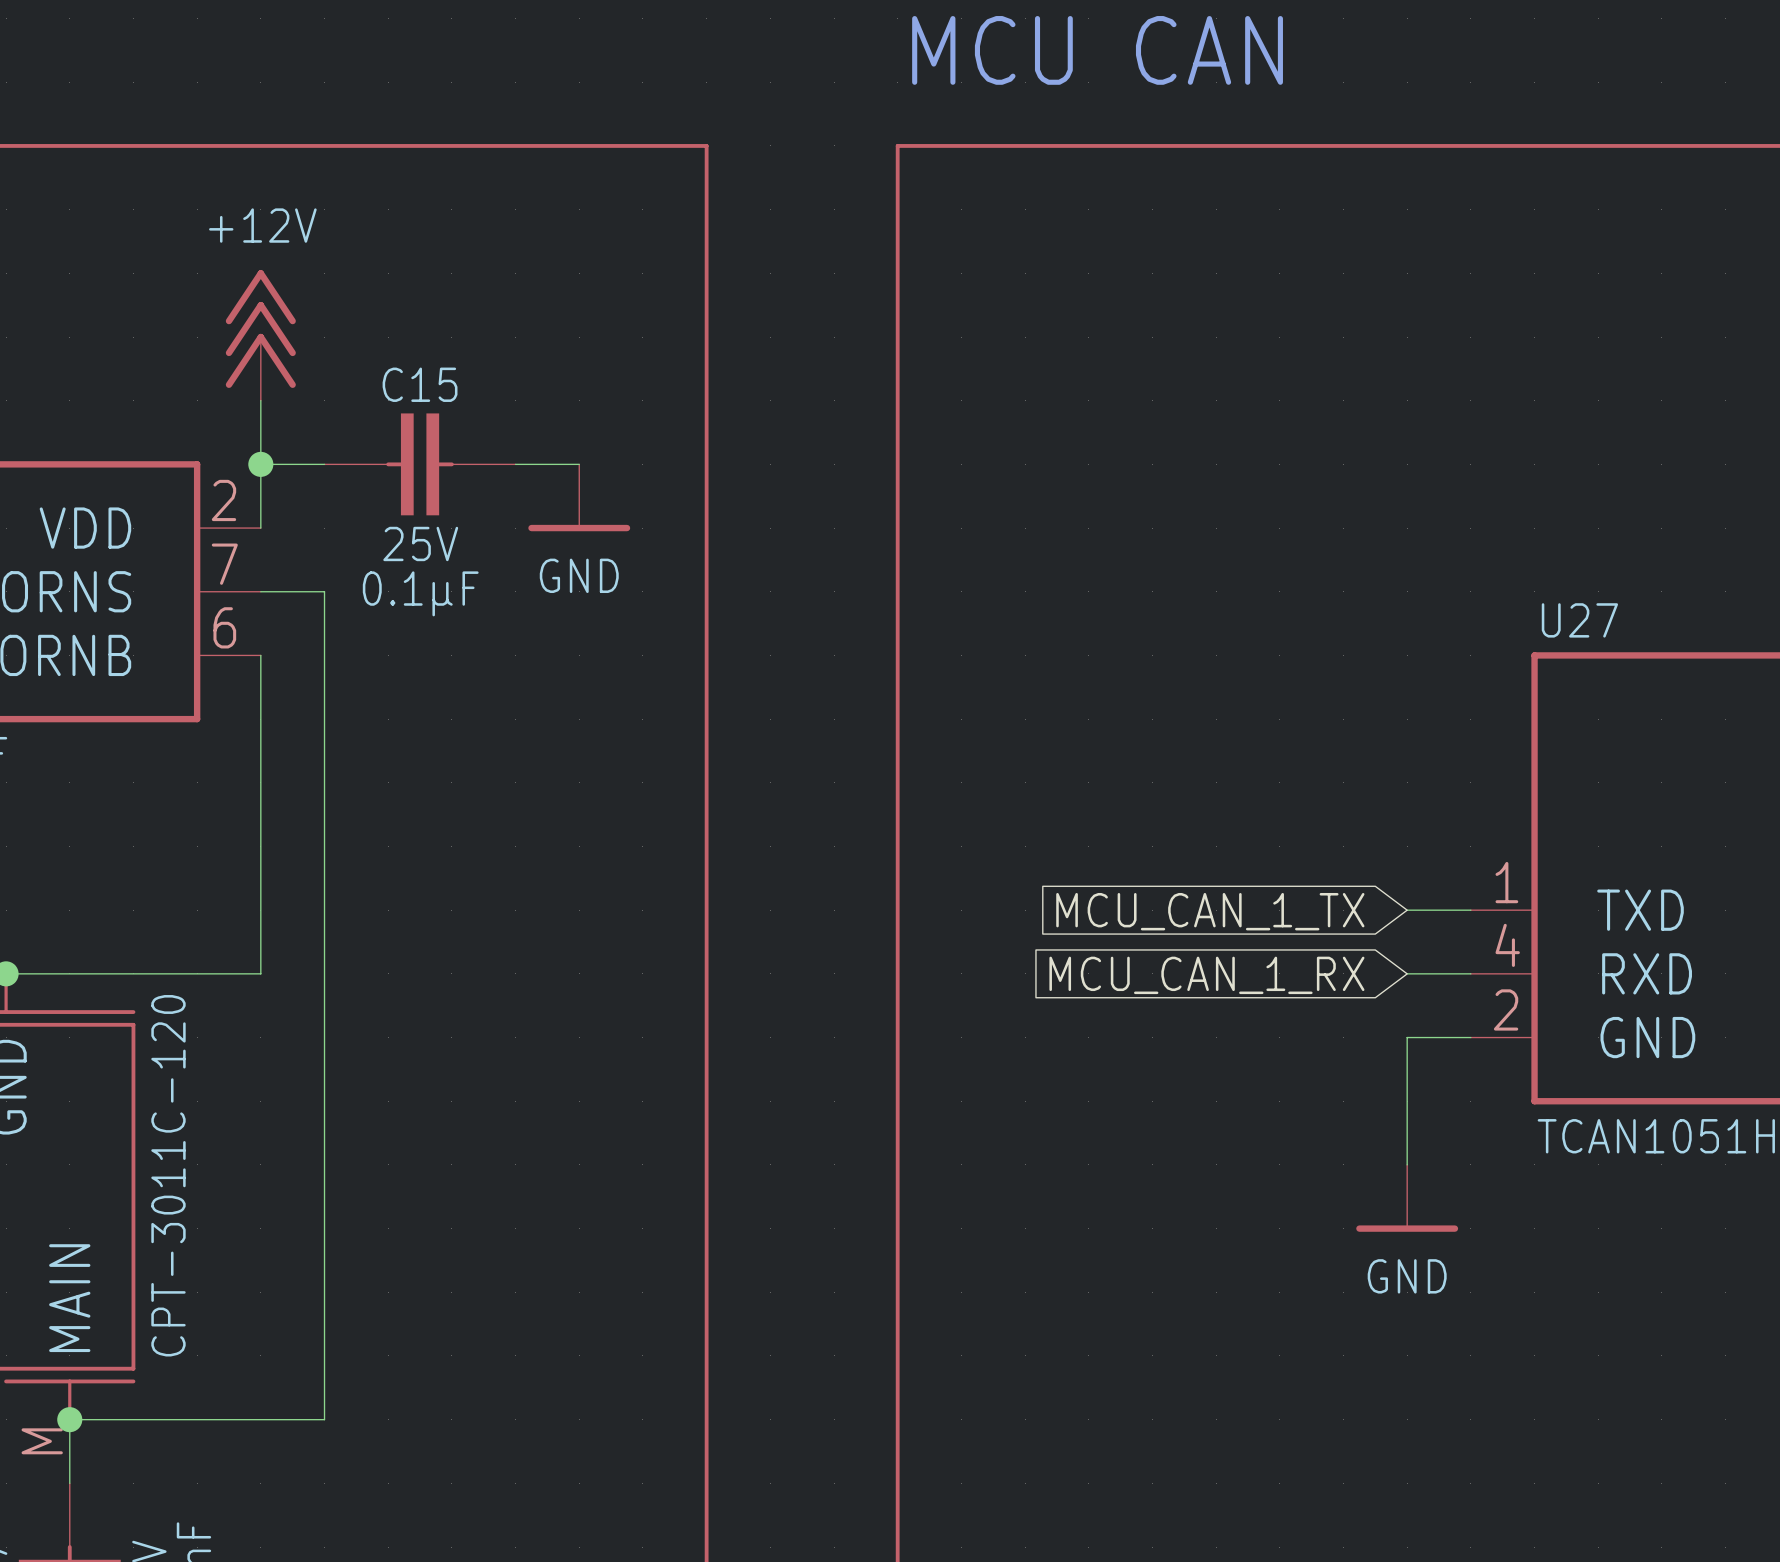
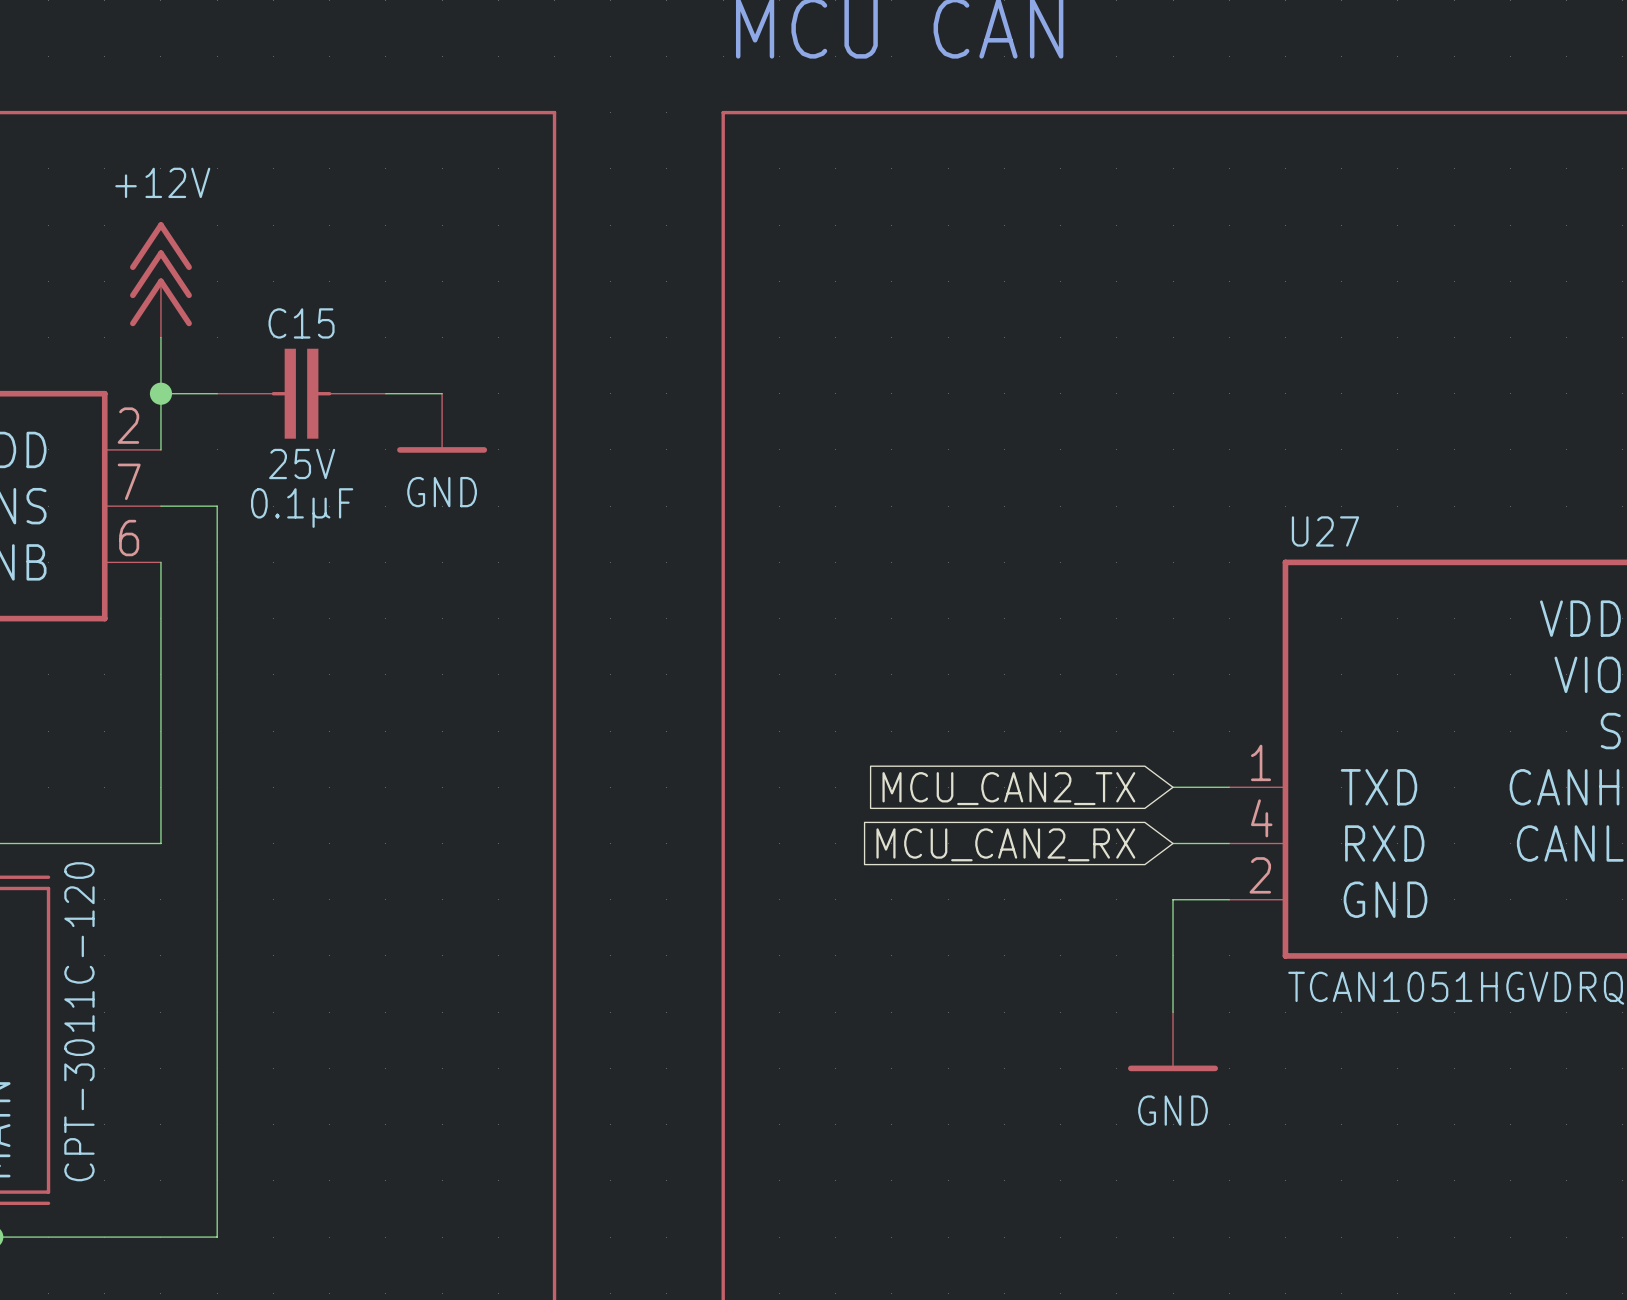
global label: MCU_CAN_1_TX (1210, 911) -> MCU_CAN2_TX (1008, 788)
global label: MCU_CAN_1_RX (1206, 975) -> MCU_CAN2_RX (1005, 844)

